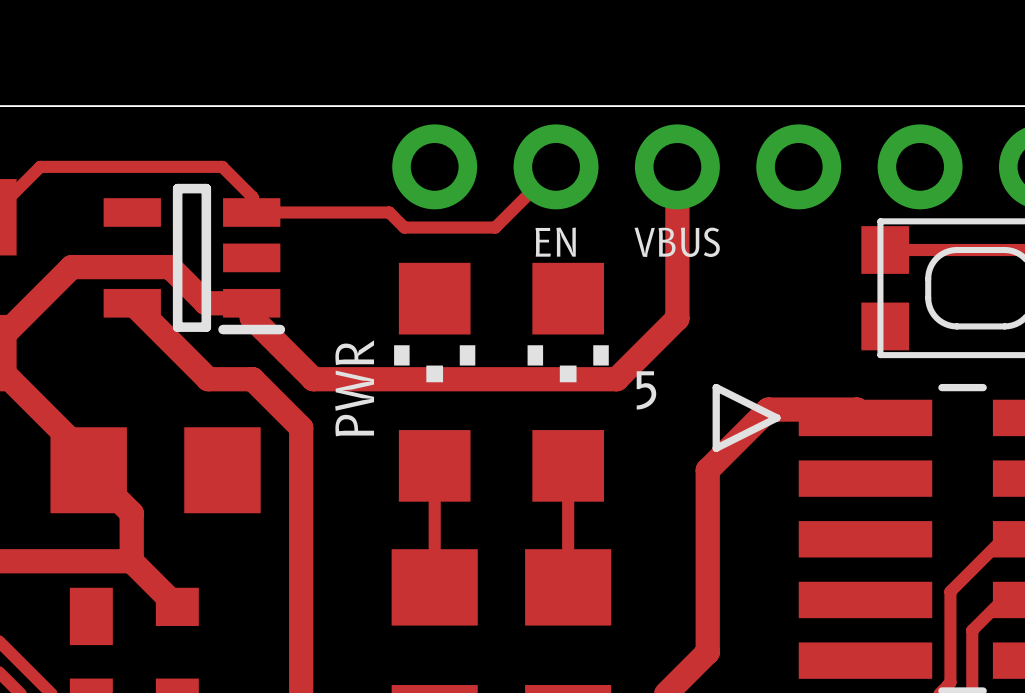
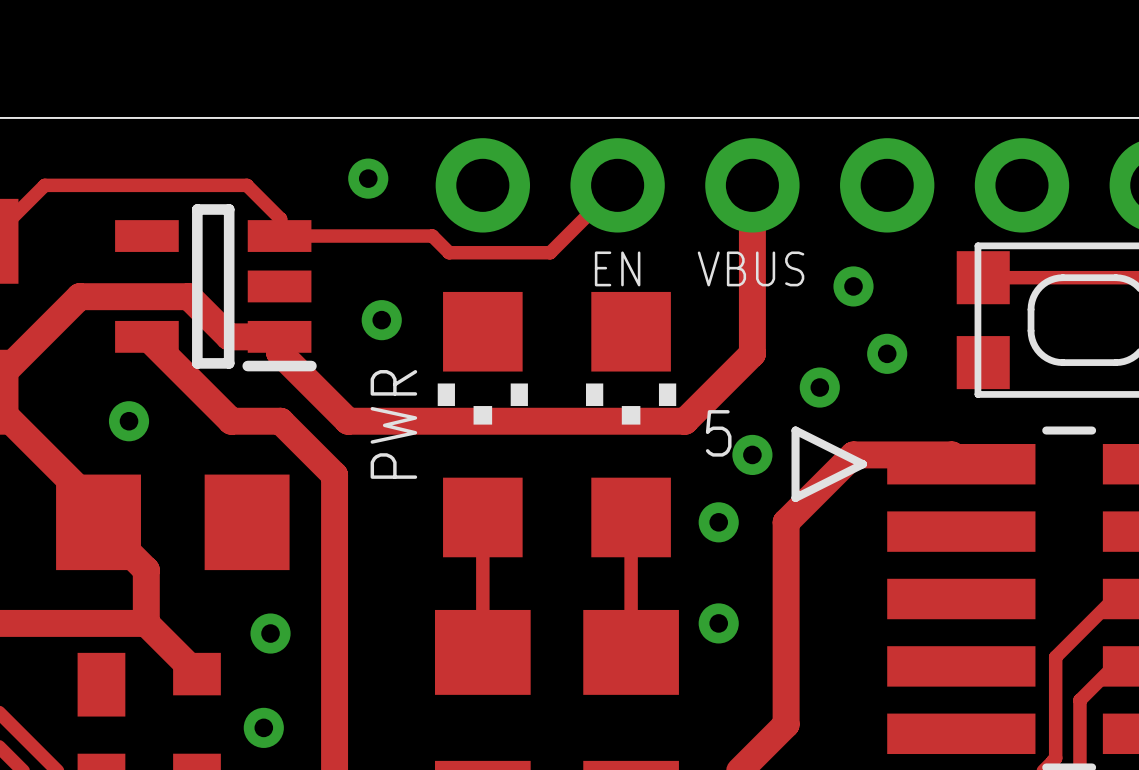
via: none -> (368, 178)
via: none -> (853, 286)
via: none -> (381, 320)
via: none -> (887, 353)
via: none -> (819, 387)
via: none -> (129, 421)
via: none -> (752, 454)
via: none -> (718, 522)
via: none -> (718, 623)
via: none -> (270, 633)
via: none -> (263, 727)

